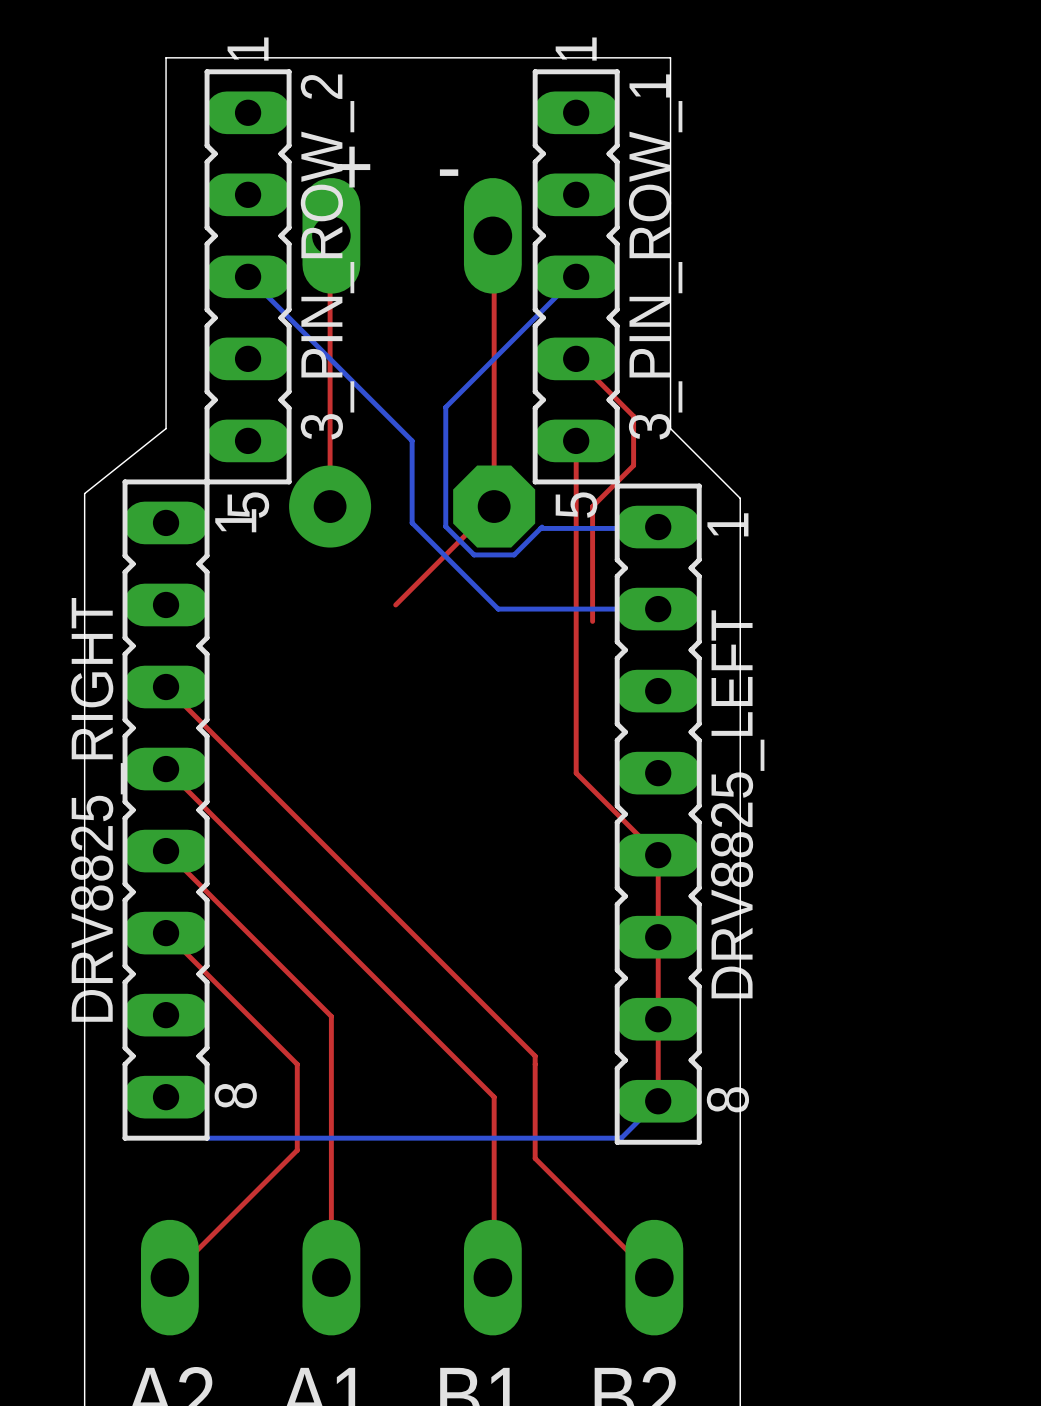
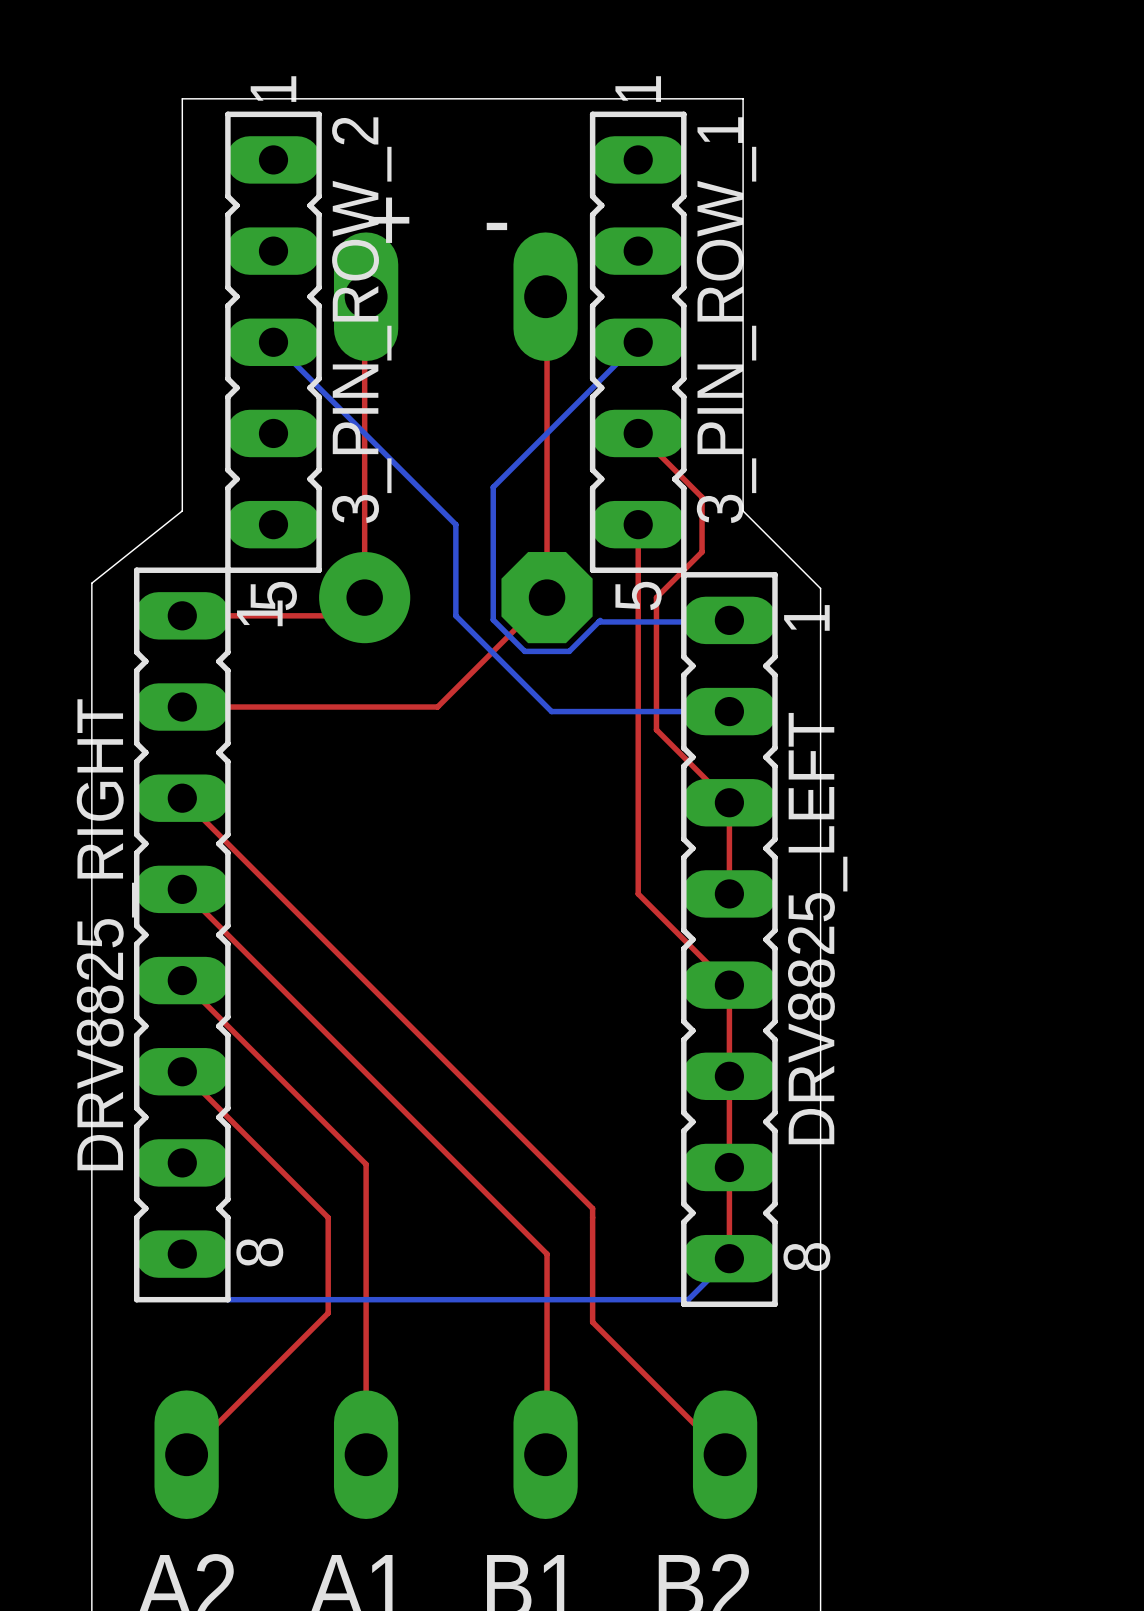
top track: none -> (346, 615) (182, 615)
top track: none -> (437, 707) (182, 707)
top track: none -> (656, 725) (656, 729) (729, 802) (729, 893)

